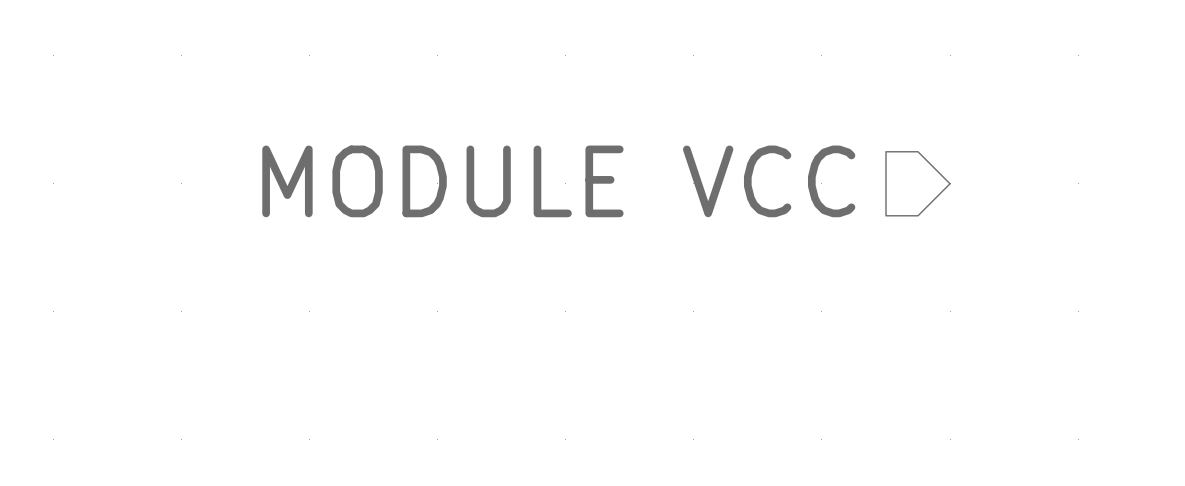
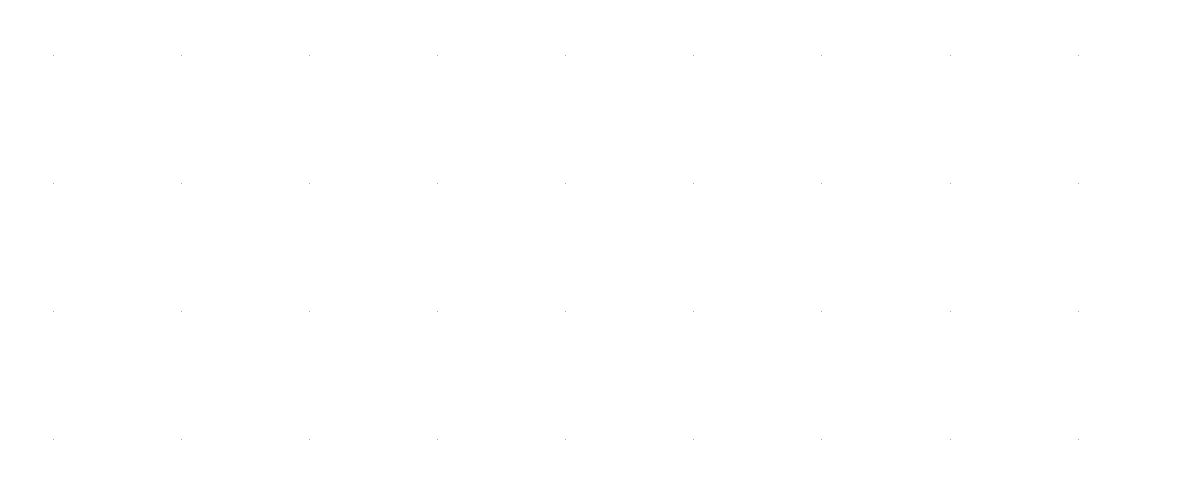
hierarchical label: MODULE VCC (558, 181) -> none

